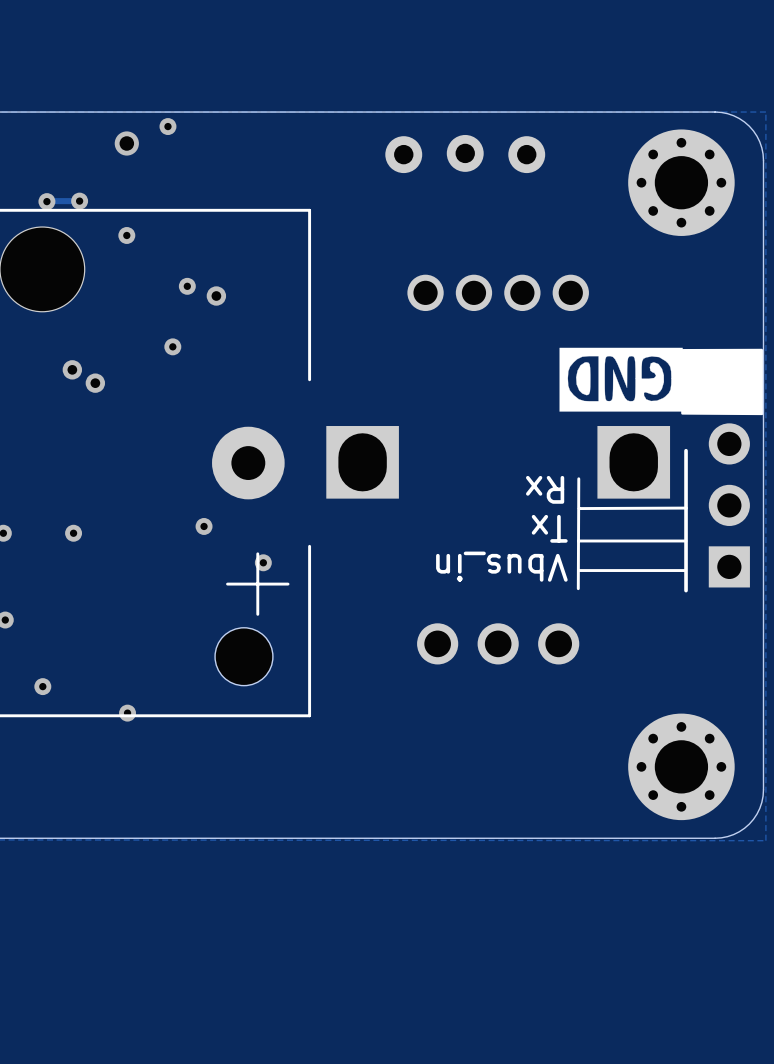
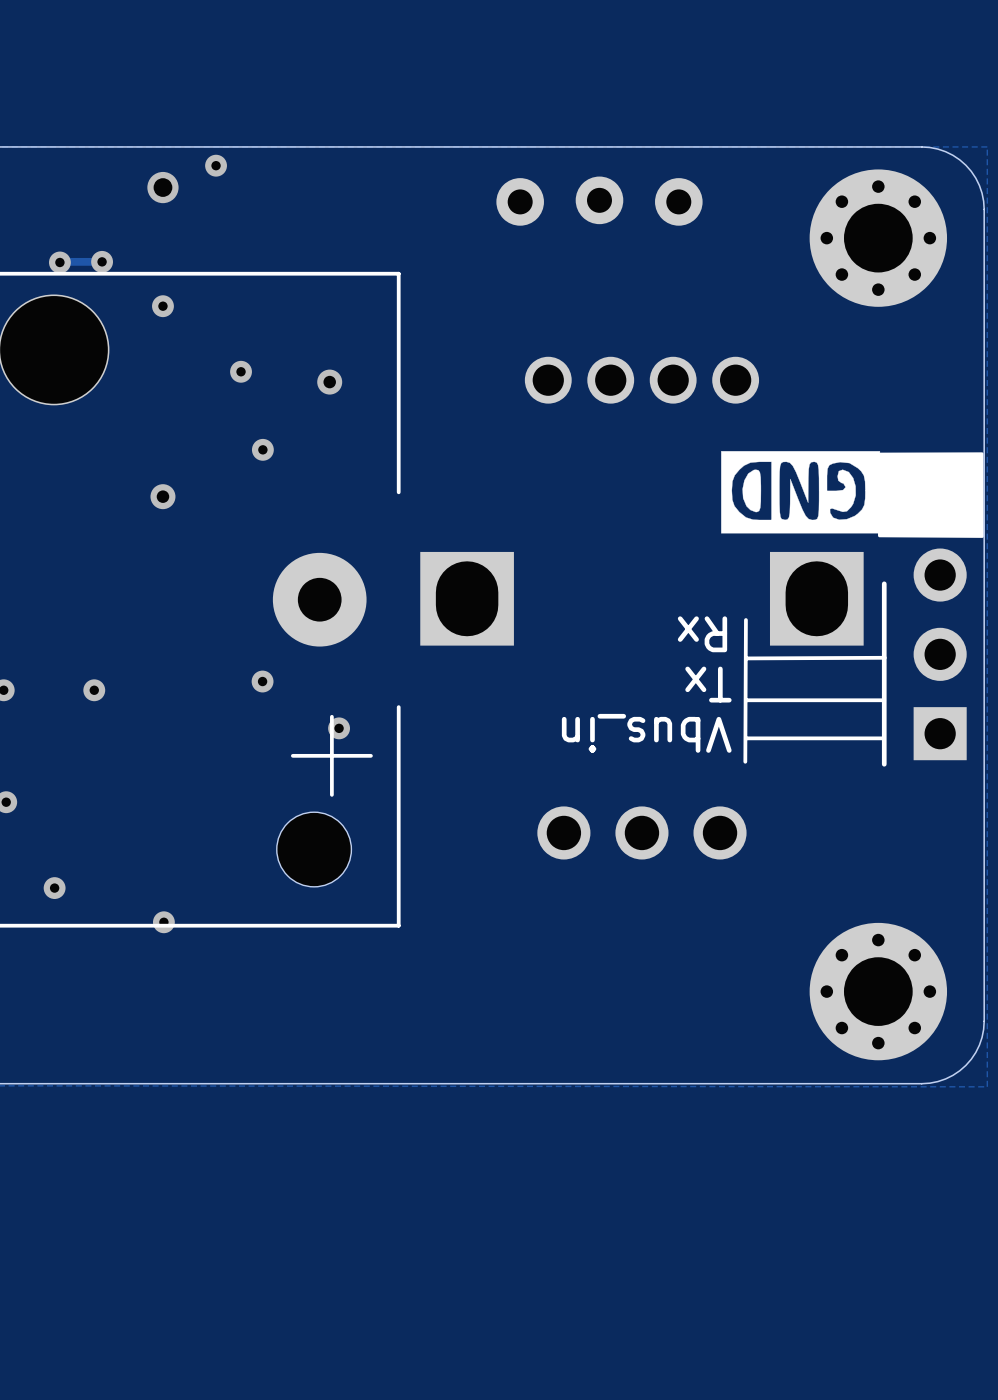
via position: (216, 296) -> (329, 382)
via position: (172, 346) -> (262, 449)
via: (72, 369) -> none
via: (95, 383) -> none
via: none -> (162, 496)

